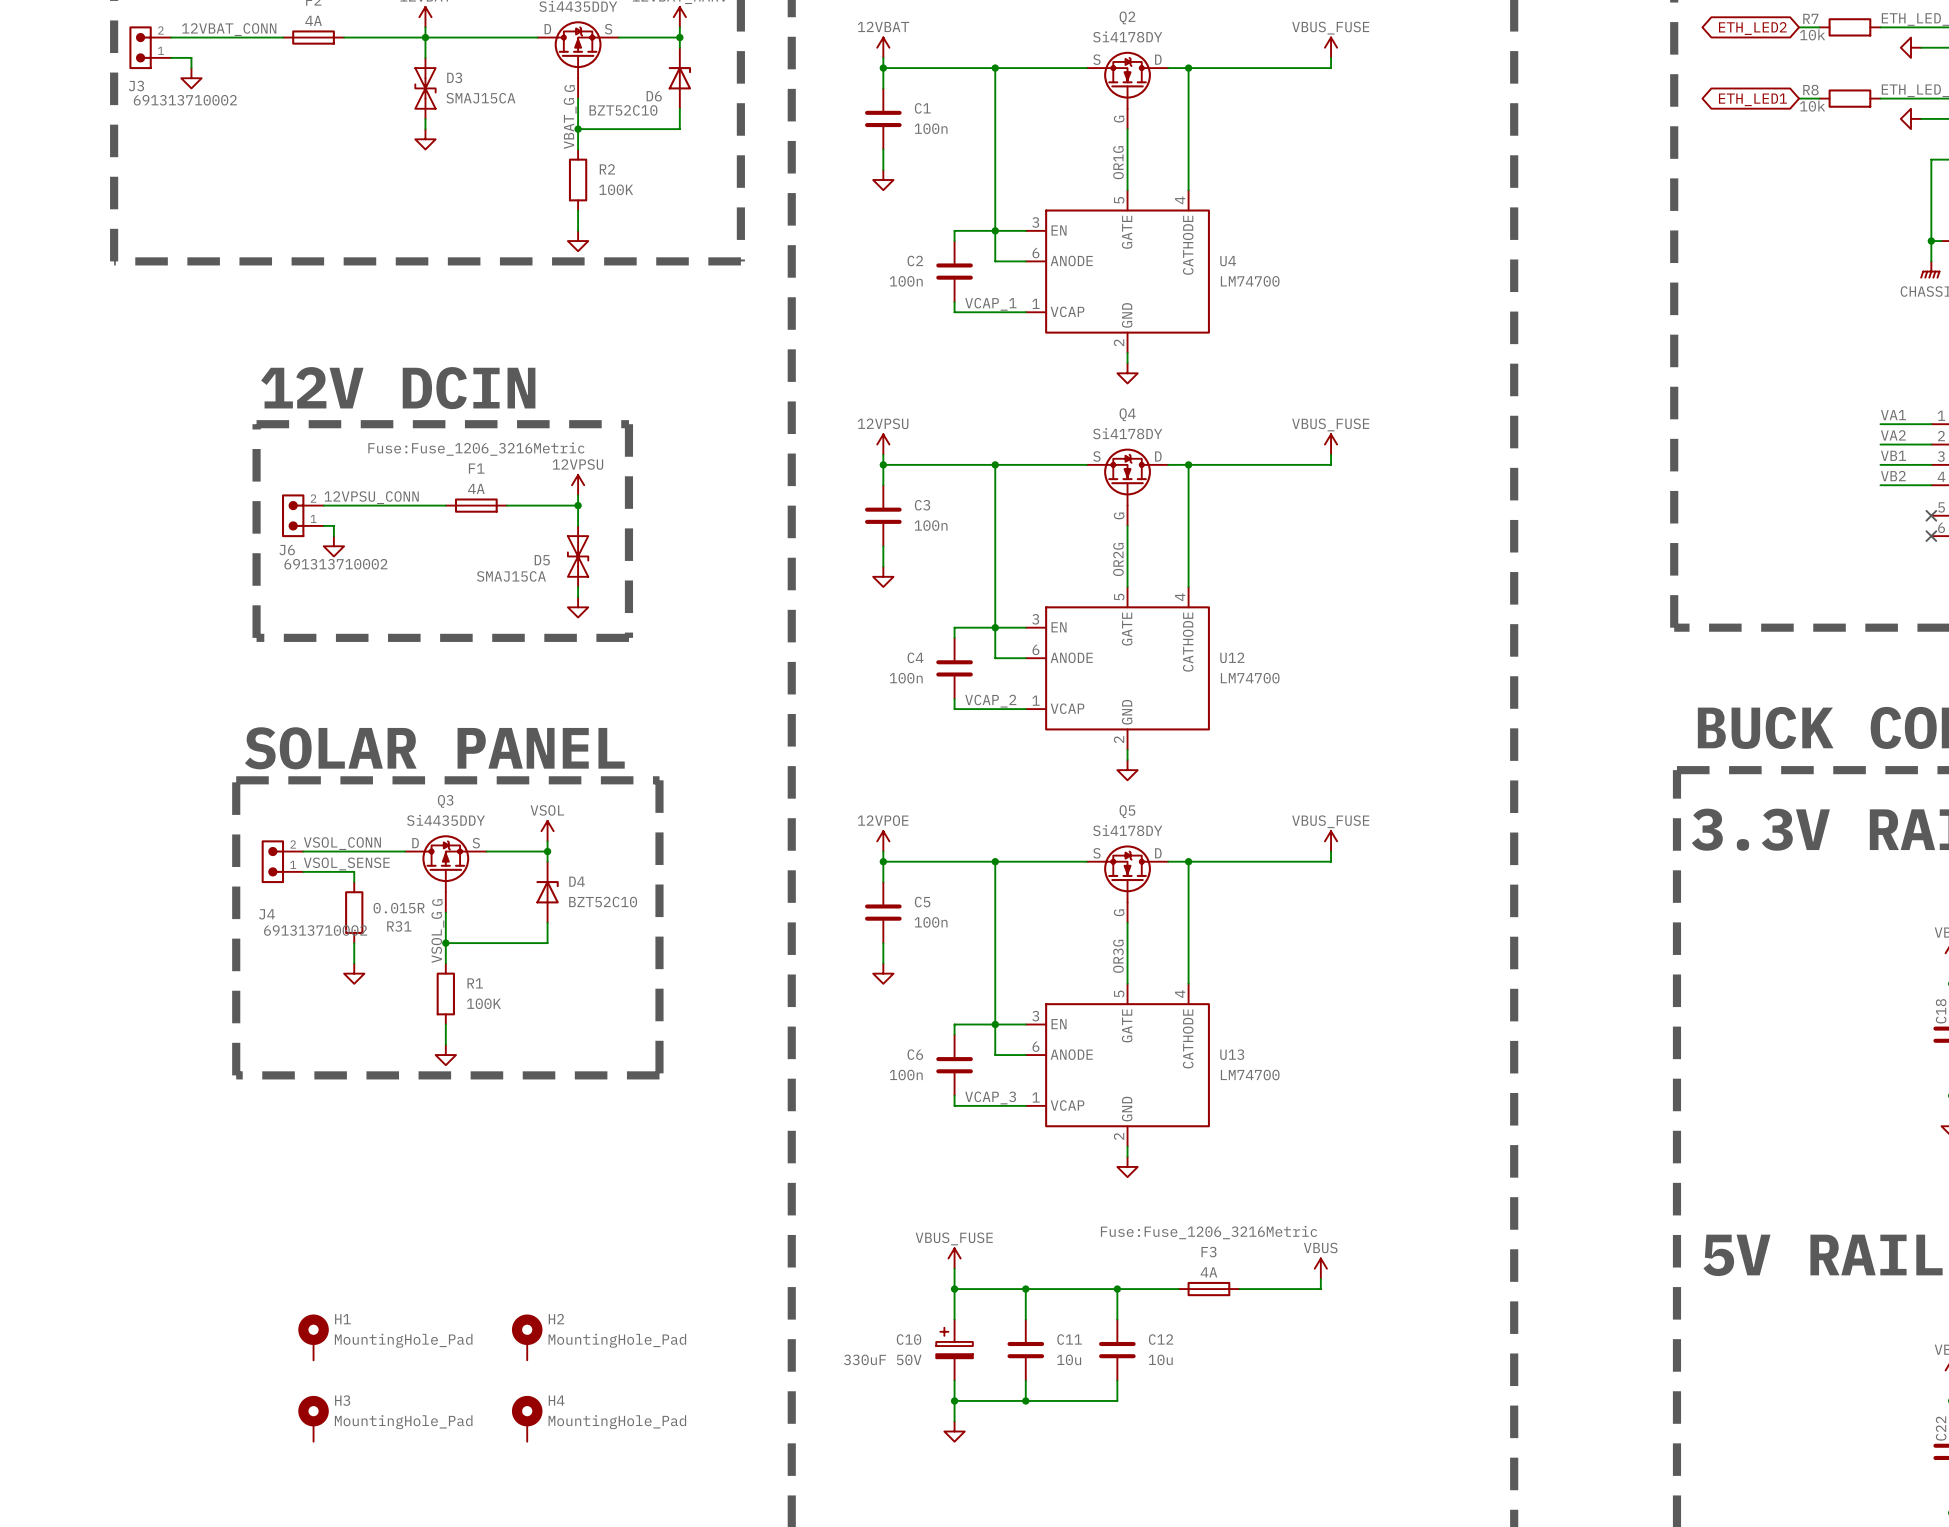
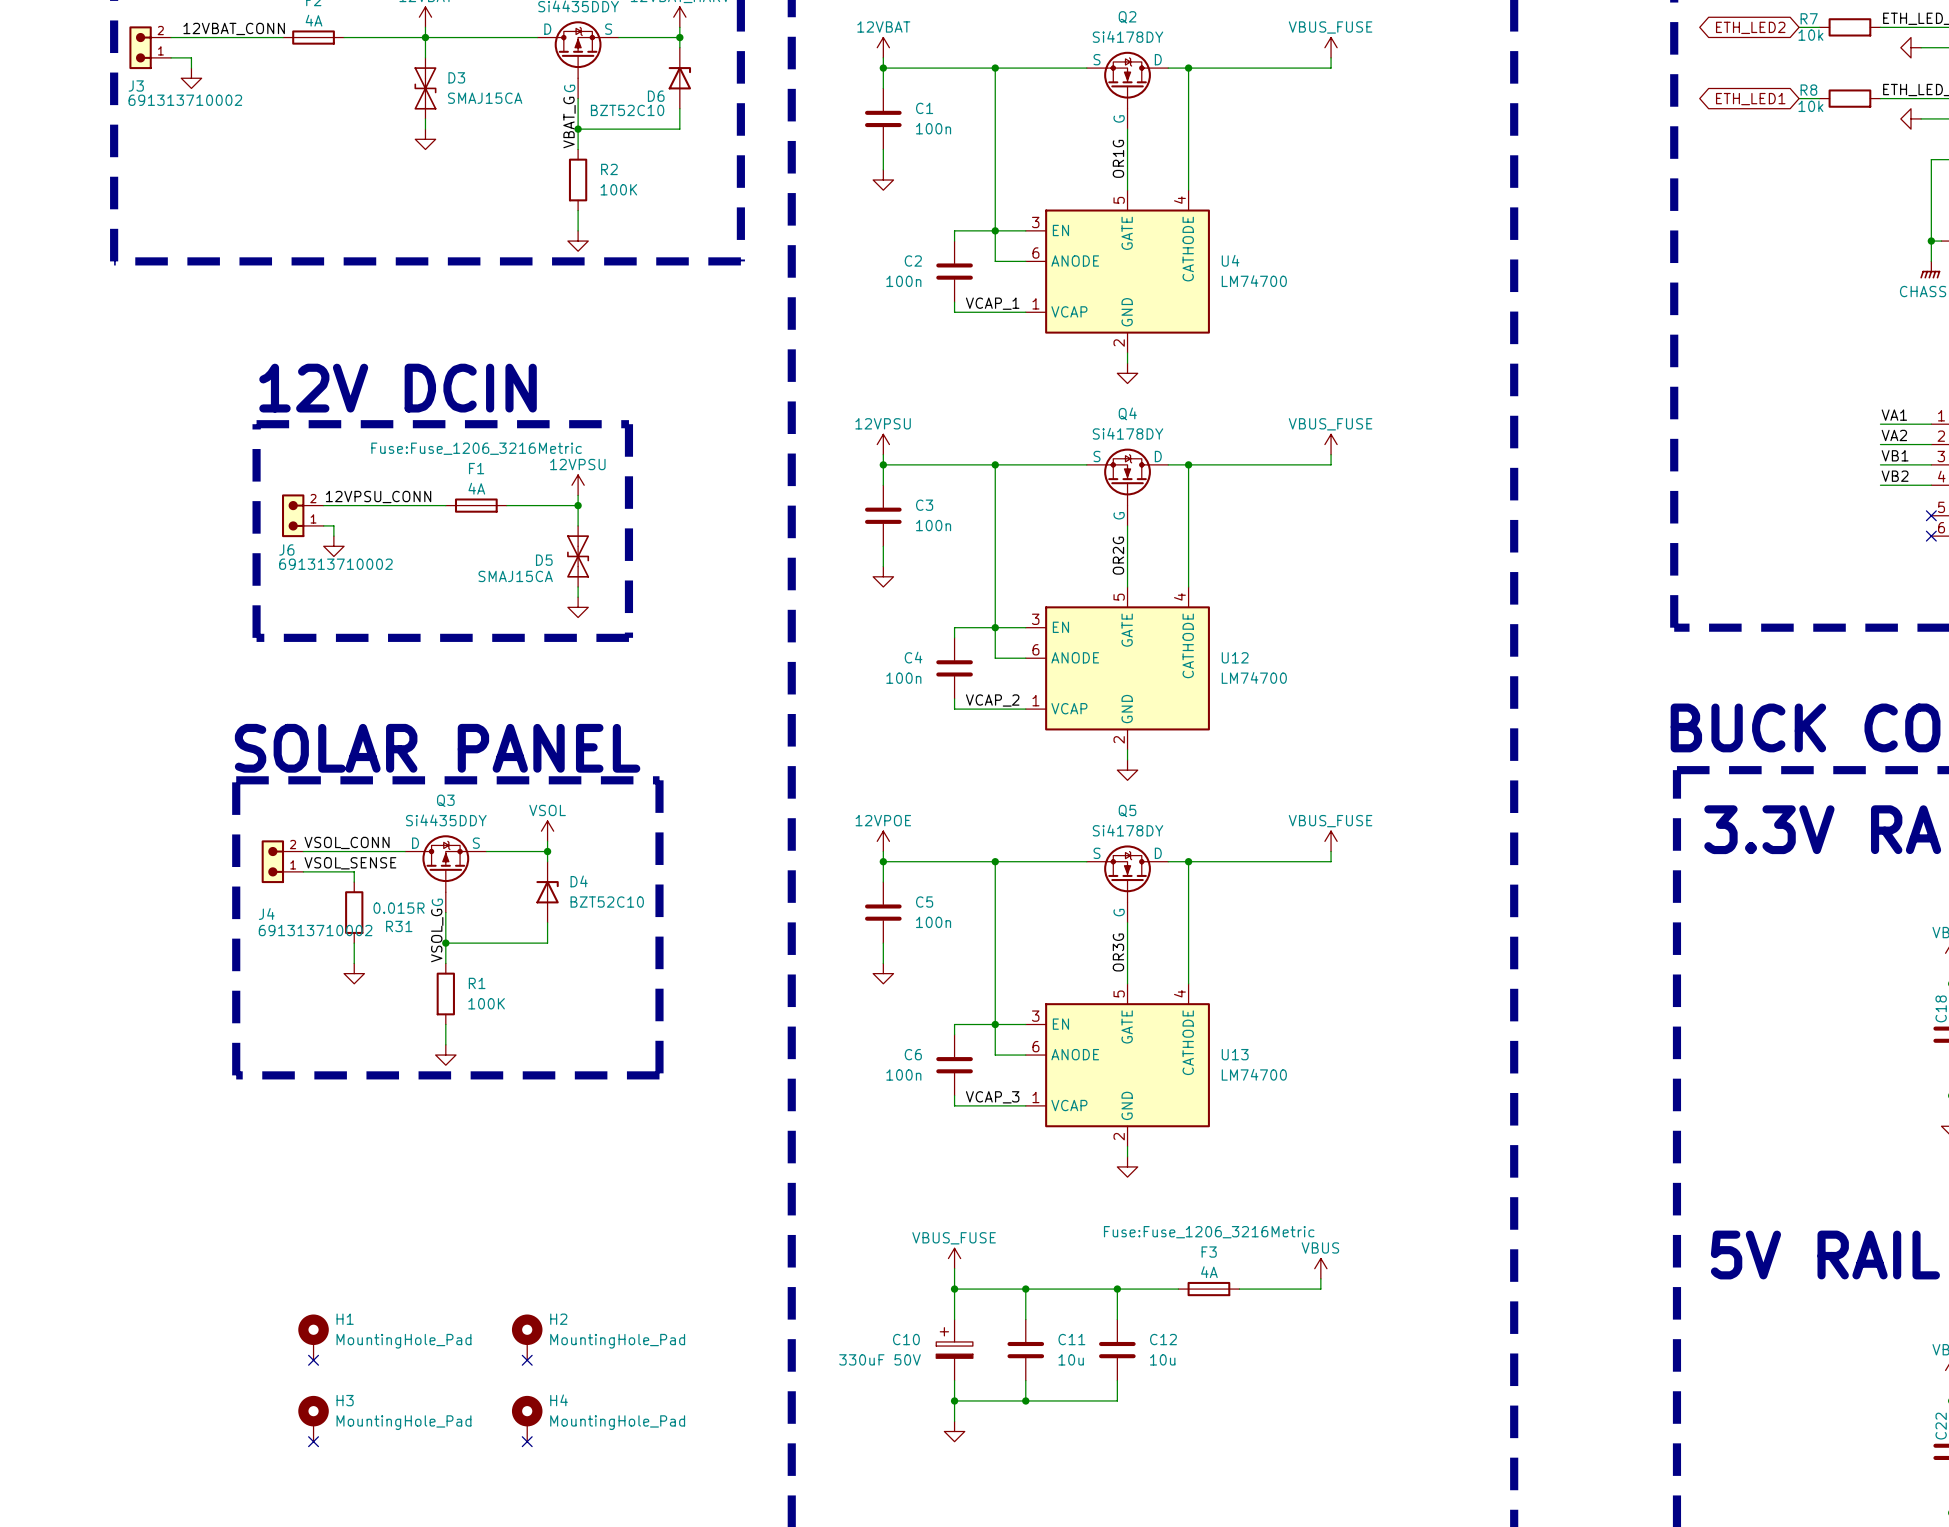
no-connect mark: none -> (313, 1360)
no-connect mark: none -> (527, 1360)
no-connect mark: none -> (313, 1441)
no-connect mark: none -> (527, 1441)

